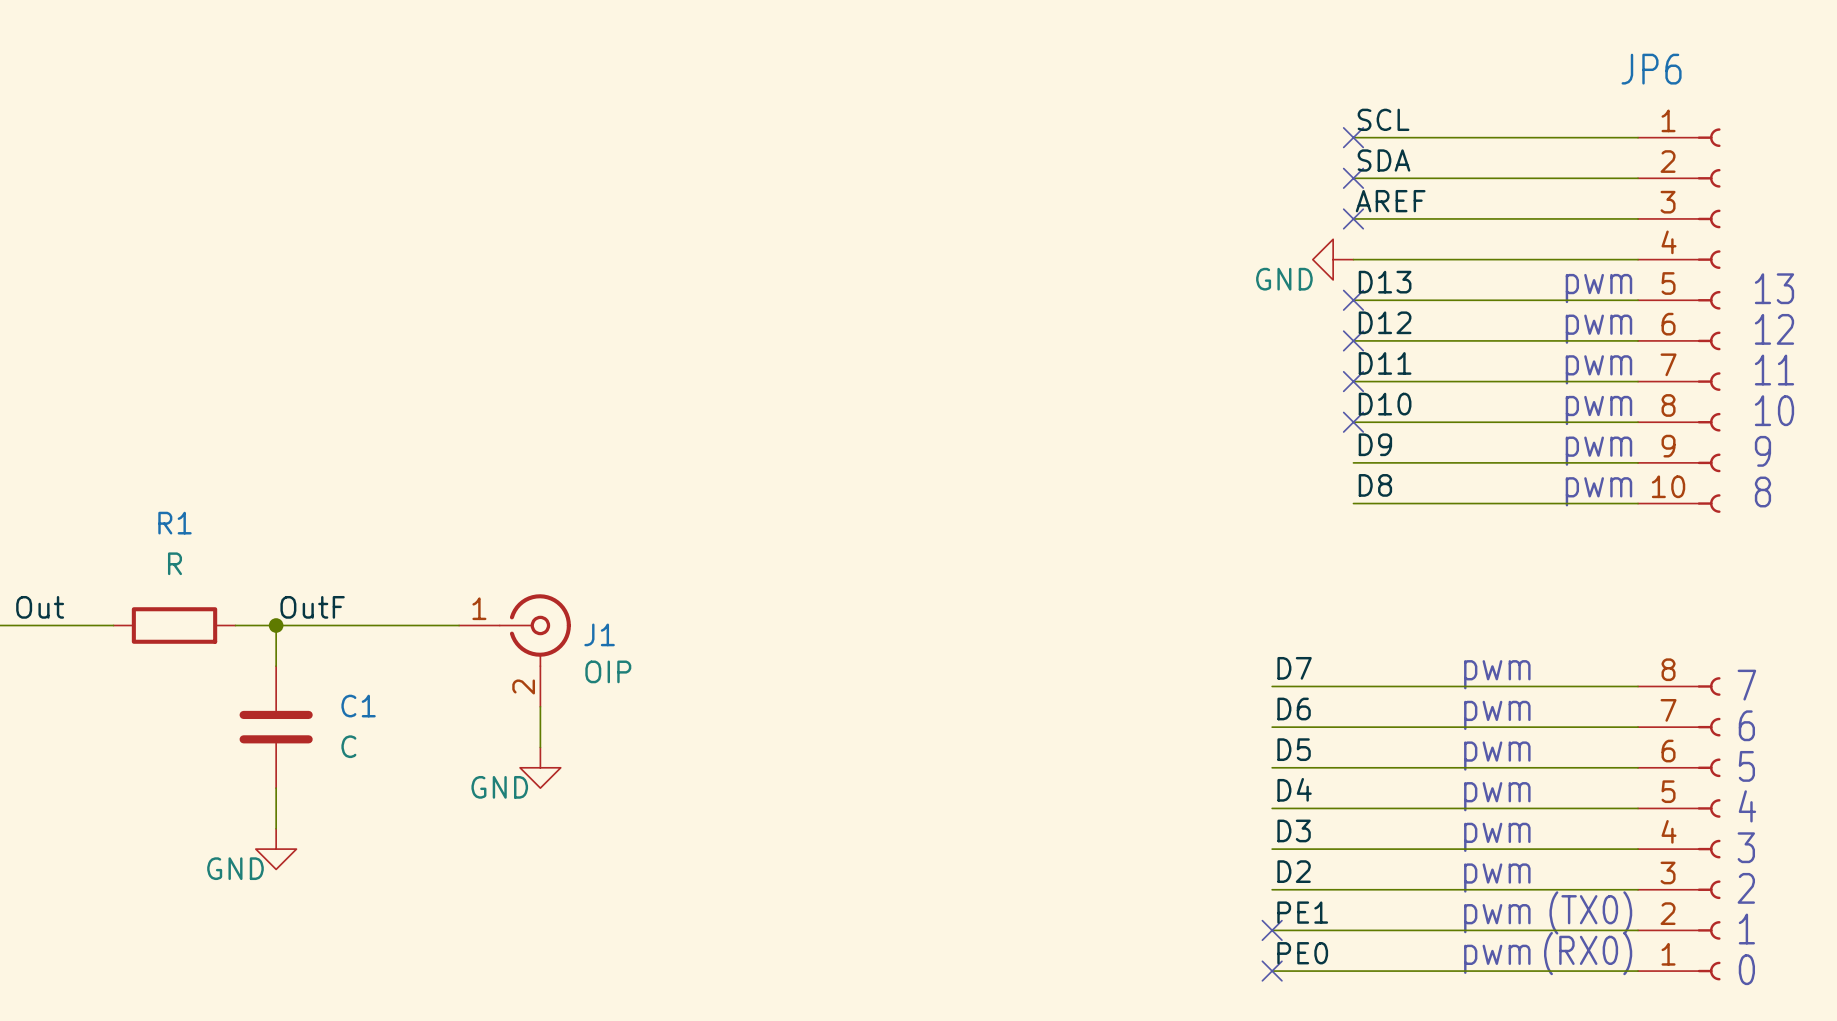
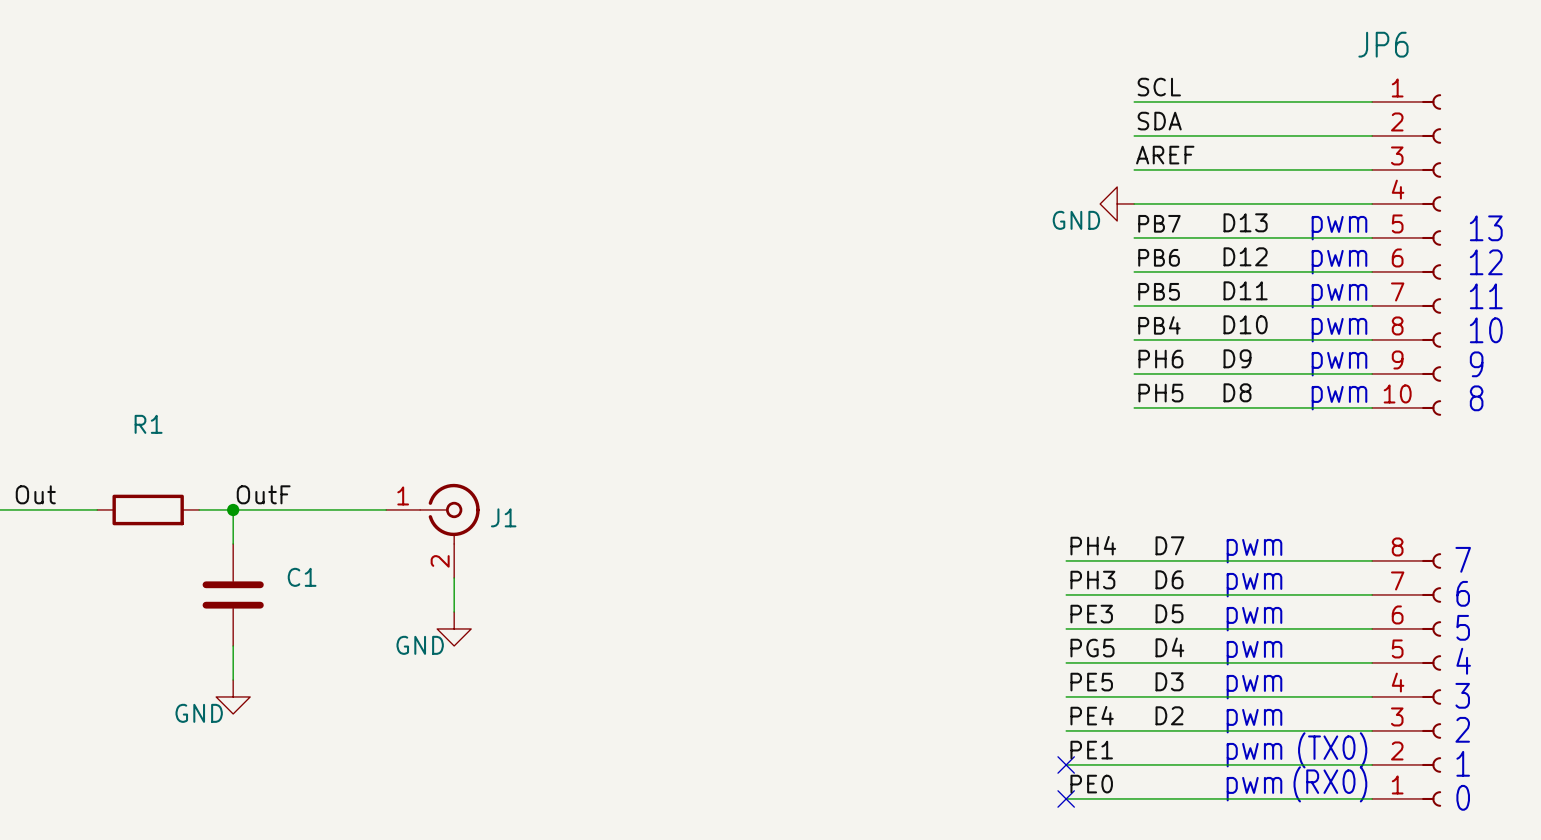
no-connect mark: (1353, 137) -> none
no-connect mark: (1353, 178) -> none
no-connect mark: (1353, 218) -> none
label: D13 (1385, 282) -> PB7 (1159, 223)
label: none -> D13 (1245, 222)
no-connect mark: (1353, 300) -> none
label: D12 (1385, 322) -> PB6 (1159, 257)
label: none -> D12 (1245, 256)
no-connect mark: (1353, 340) -> none
label: D11 (1385, 363) -> PB5 (1159, 291)
label: none -> D11 (1245, 290)
no-connect mark: (1353, 381) -> none
label: D10 (1385, 404) -> PB4 (1159, 325)
label: none -> D10 (1245, 324)
no-connect mark: (1353, 422) -> none
label: D9 (1375, 444) -> PH6 (1160, 359)
label: none -> D9 (1237, 358)
label: D8 (1375, 485) -> PH5 (1160, 393)
label: none -> D8 (1237, 392)
R1 value: R (174, 563) -> none
label: D7 (1294, 668) -> PH4 (1093, 545)
label: none -> D7 (1169, 545)
J1 value: OIP (608, 671) -> none
label: D6 (1294, 709) -> PH3 (1092, 580)
label: none -> D6 (1169, 579)
C1 value: C (348, 746) -> none
label: D5 (1294, 749) -> PE3 (1091, 614)
label: none -> D5 (1169, 613)
label: D4 (1294, 789) -> PG5 (1092, 648)
label: none -> D4 (1169, 647)
label: D3 (1294, 830) -> PE5 (1091, 682)
label: none -> D3 (1169, 681)
label: D2 (1294, 871) -> PE4 (1092, 715)
label: none -> D2 (1169, 715)

